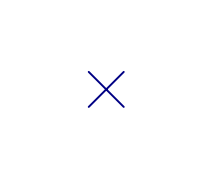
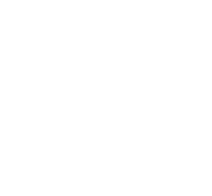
no-connect mark: (106, 89) -> none

